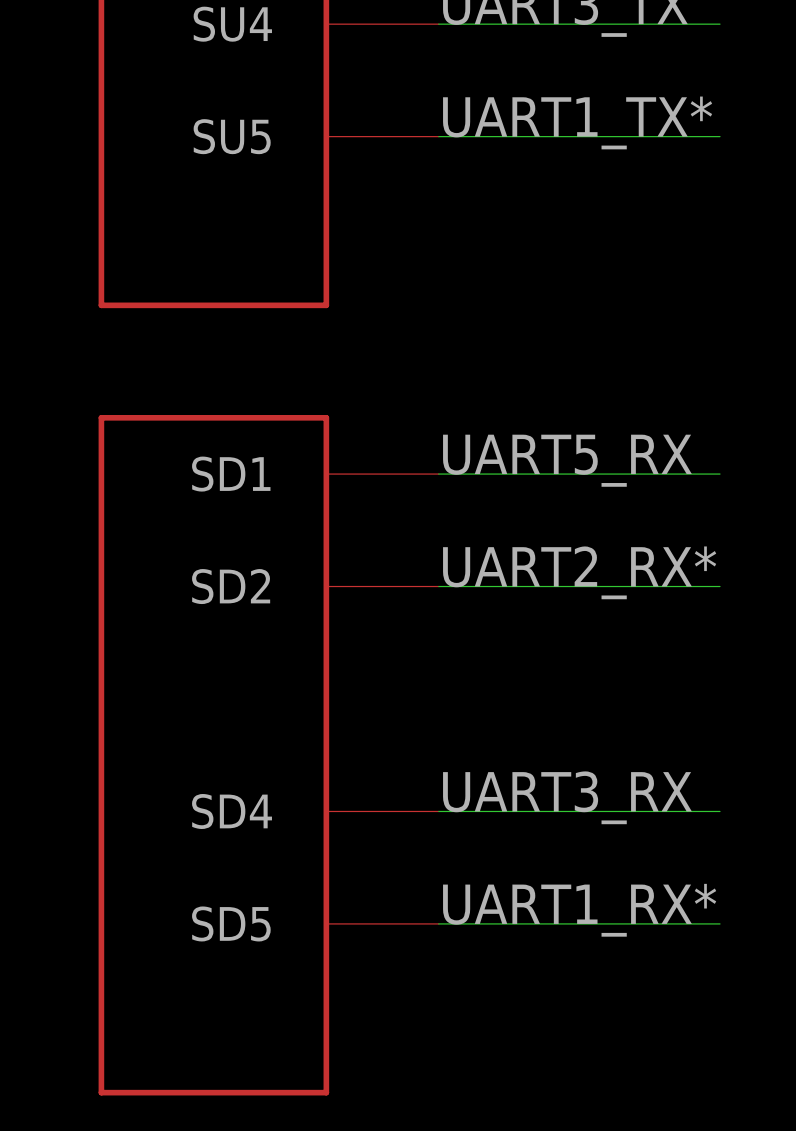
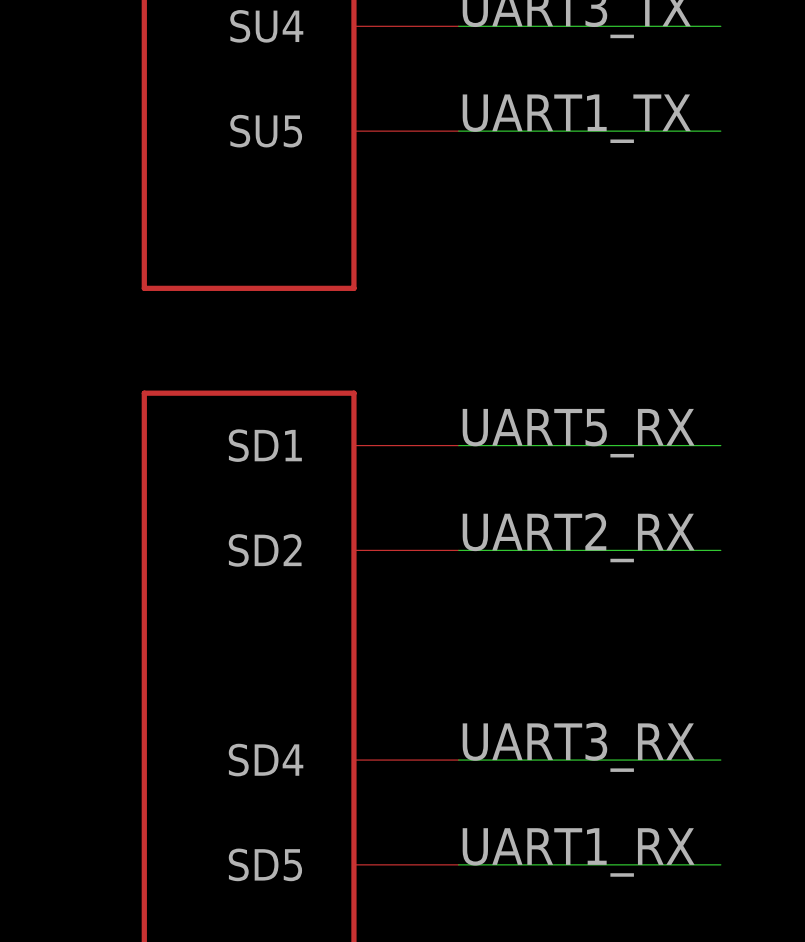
label: UART1_TX* (577, 122) -> UART1_TX (576, 118)
label: UART2_RX* (579, 572) -> UART2_RX (578, 537)
label: UART1_RX* (579, 910) -> UART1_RX (578, 852)

